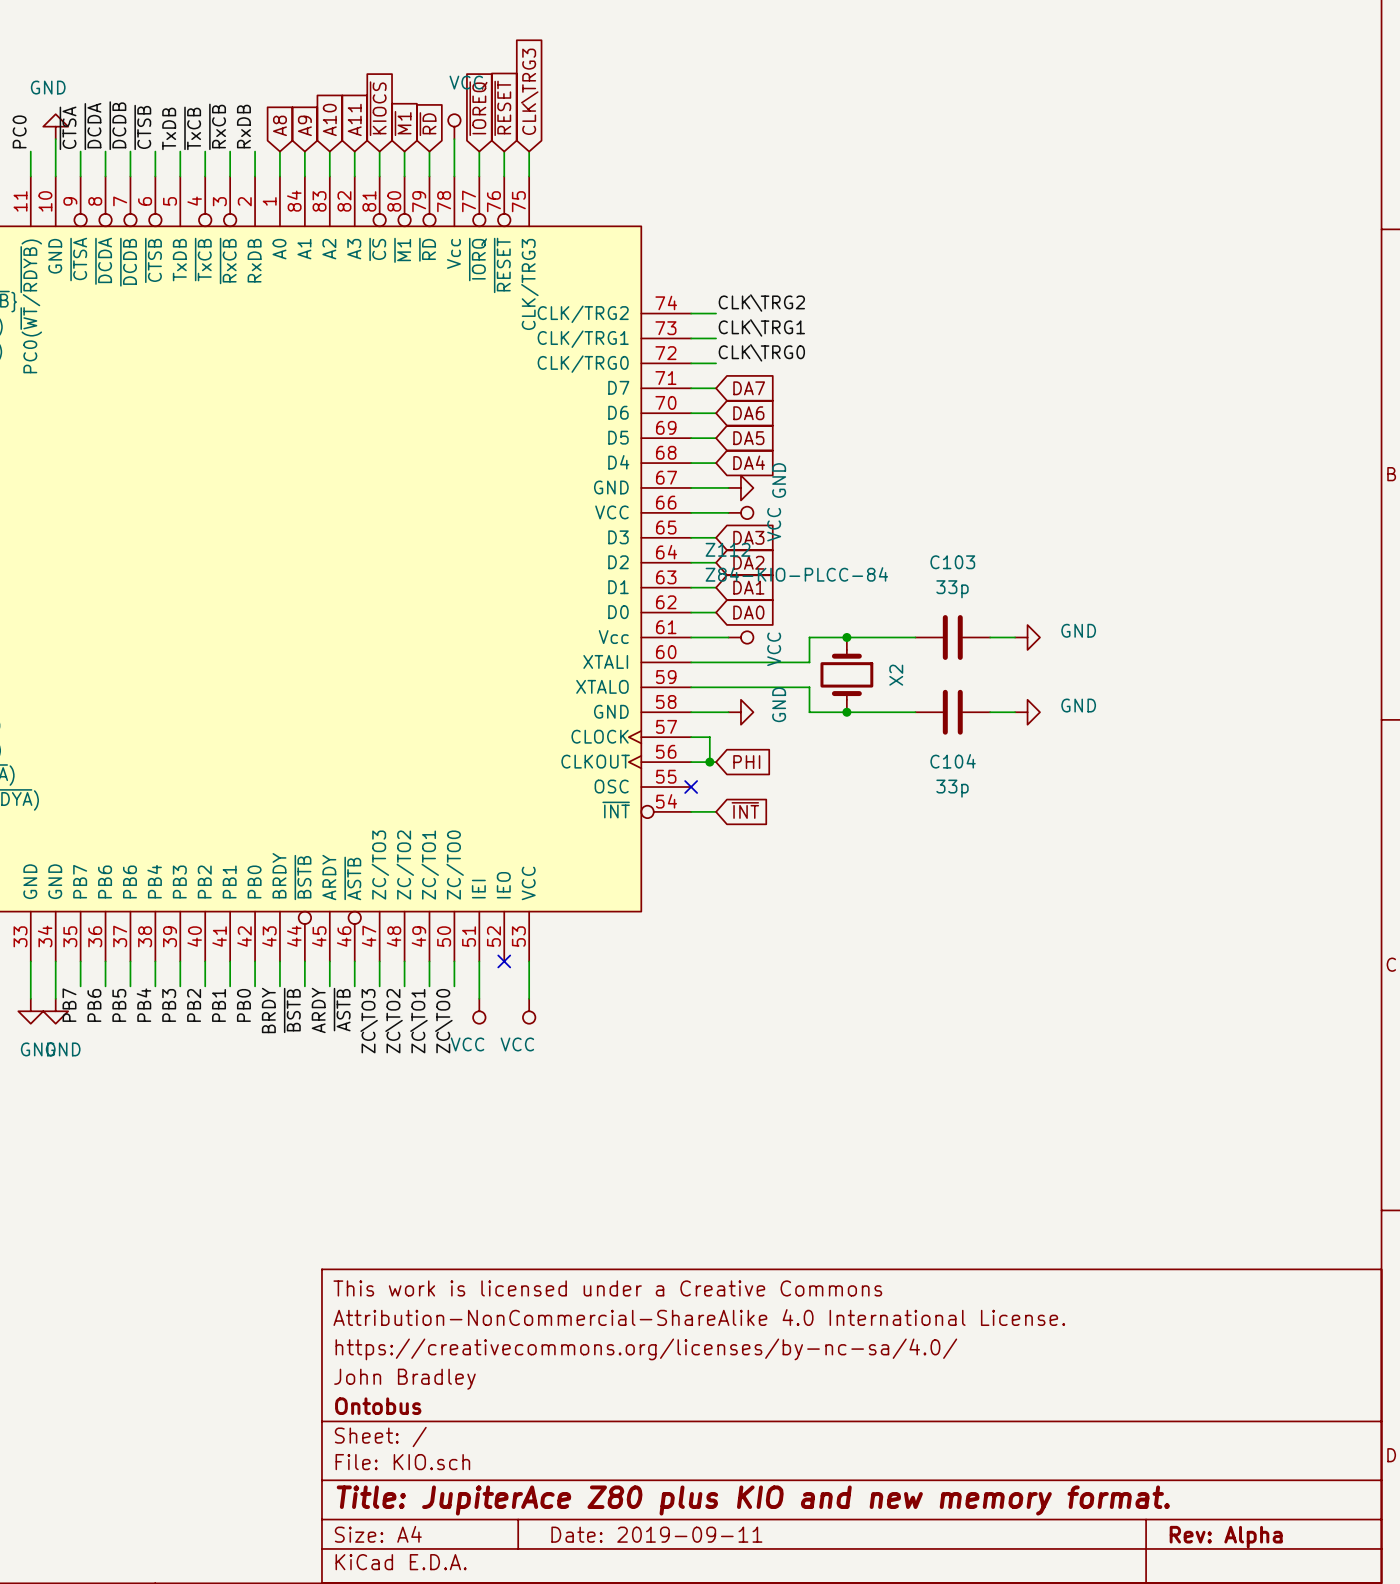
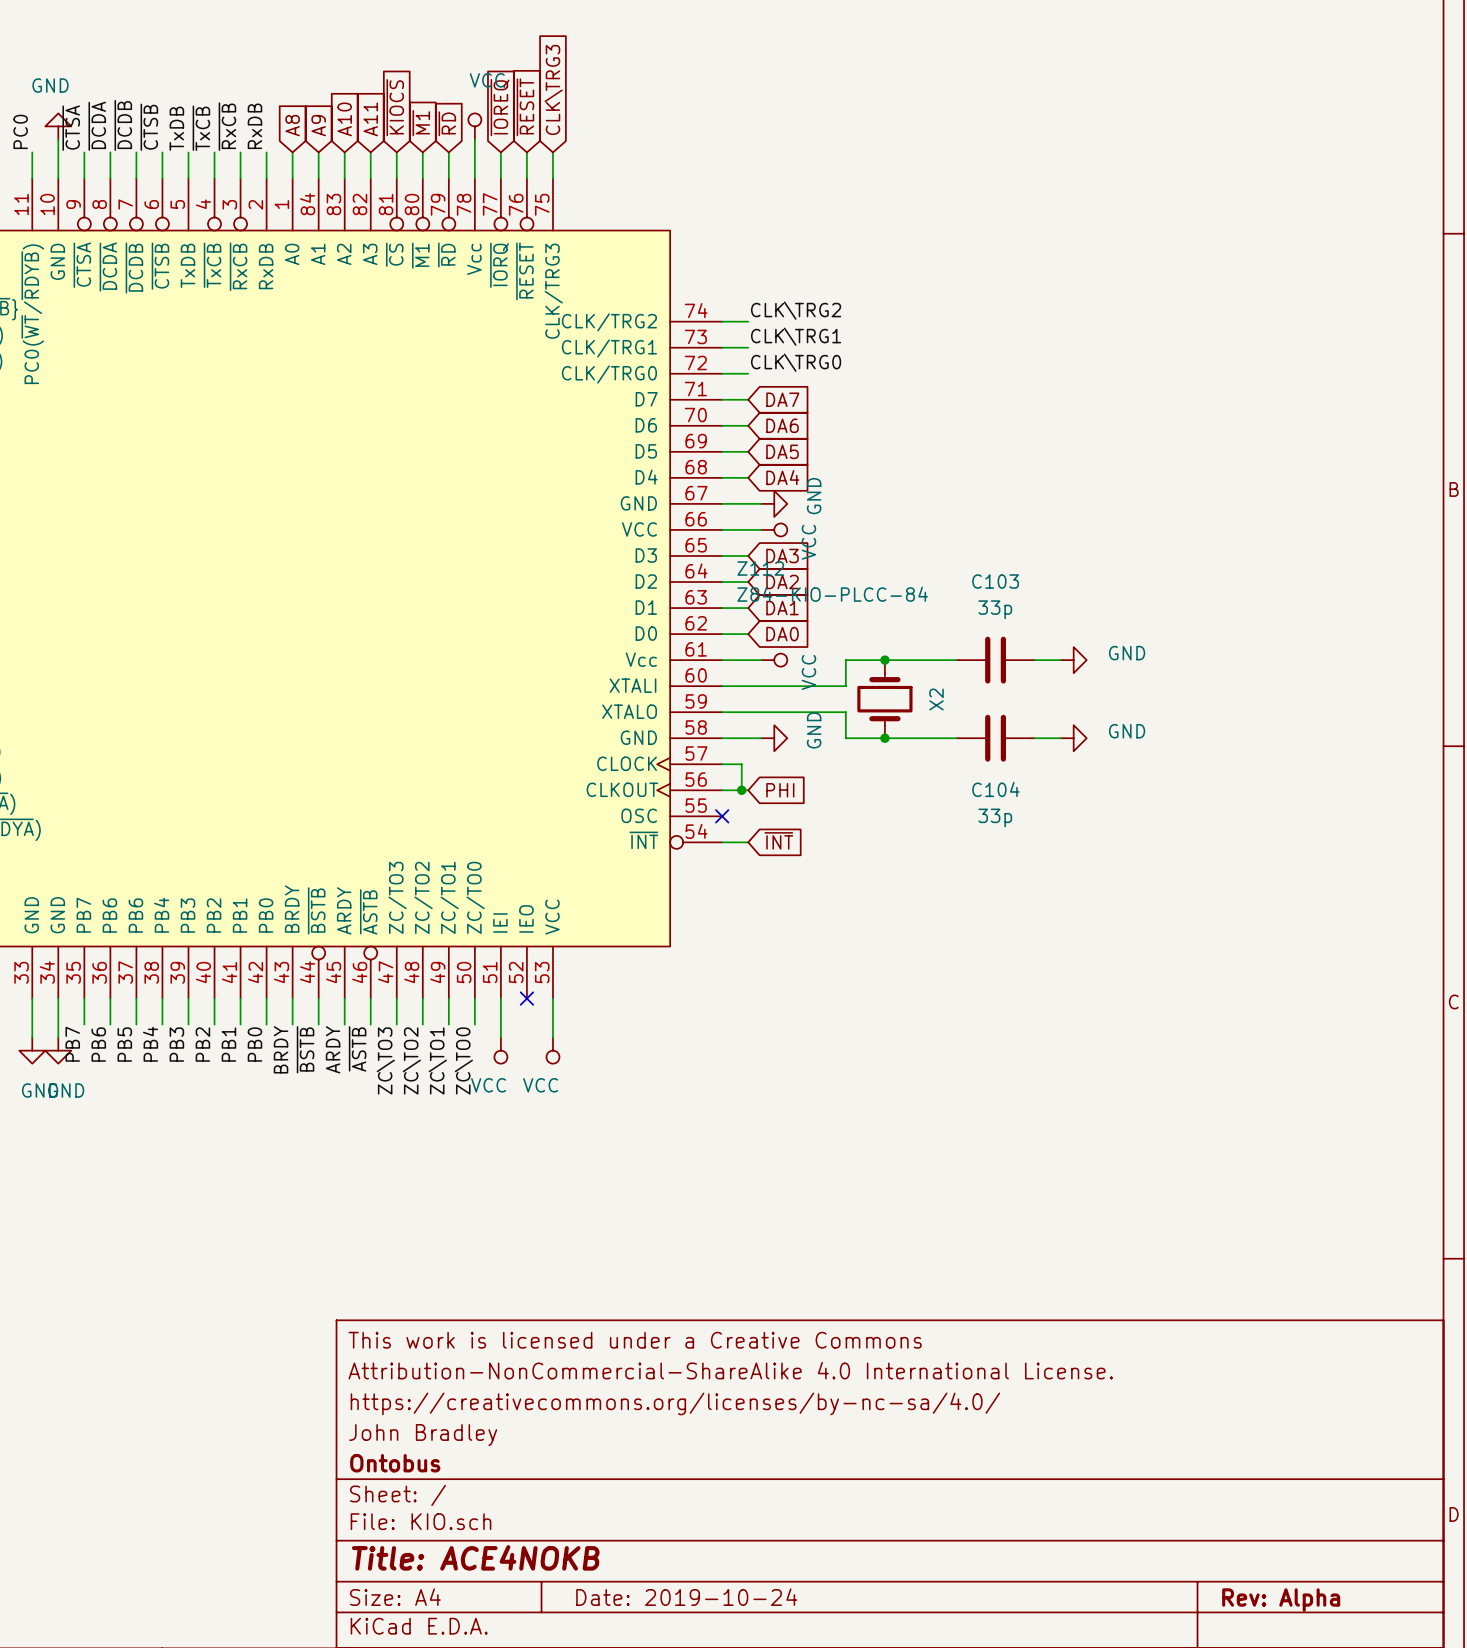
title block: Title: JupiterAce Z80 plus KIO and new memory format. (753, 1500) -> Title: ACE4NOKB (475, 1557)
title block: Date: 2019-09-11 (656, 1534) -> Date: 2019-10-24 (686, 1597)

